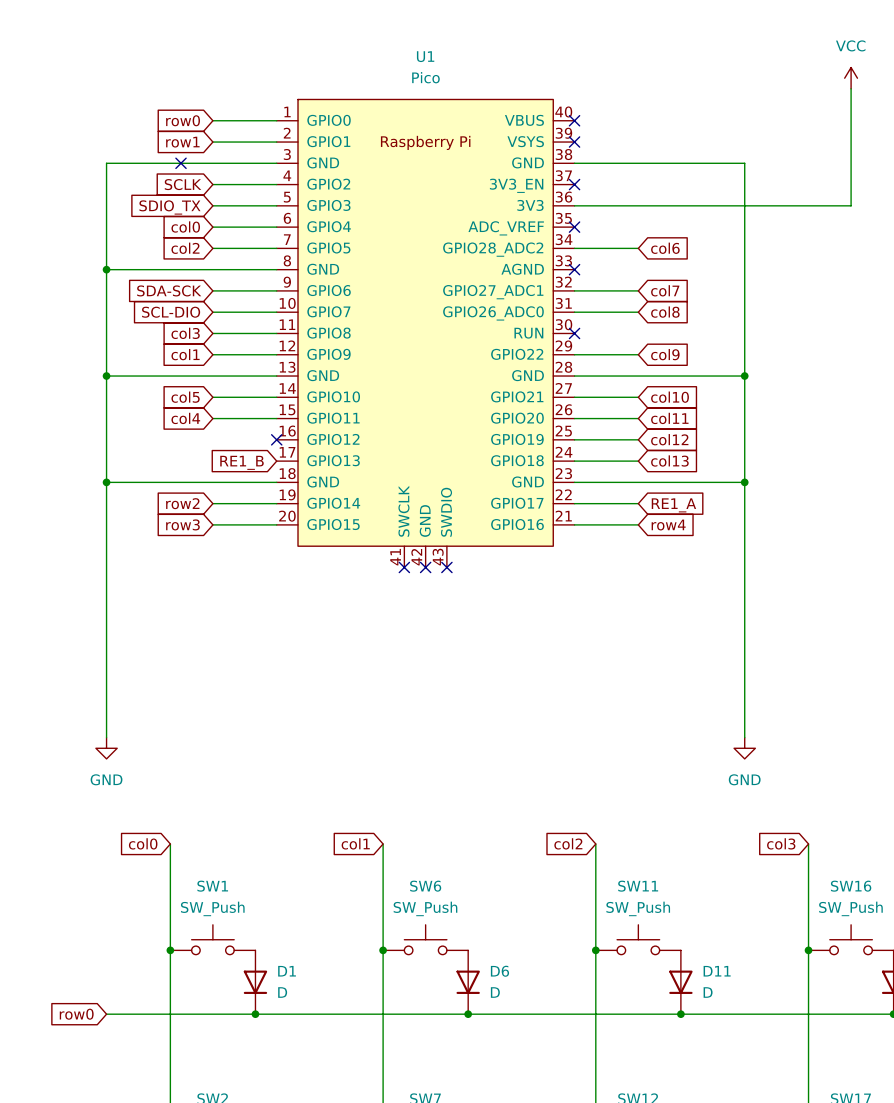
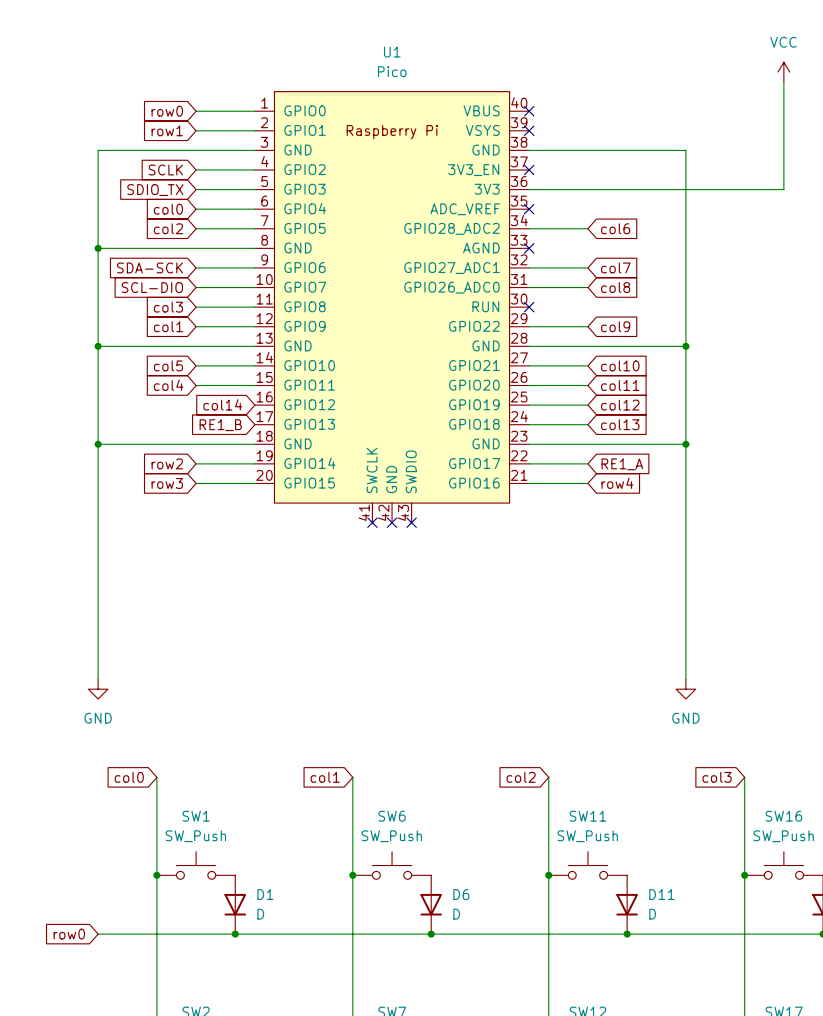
no-connect mark: (181, 163) -> none
global label: none -> col14 (222, 404)
no-connect mark: (276, 439) -> none

